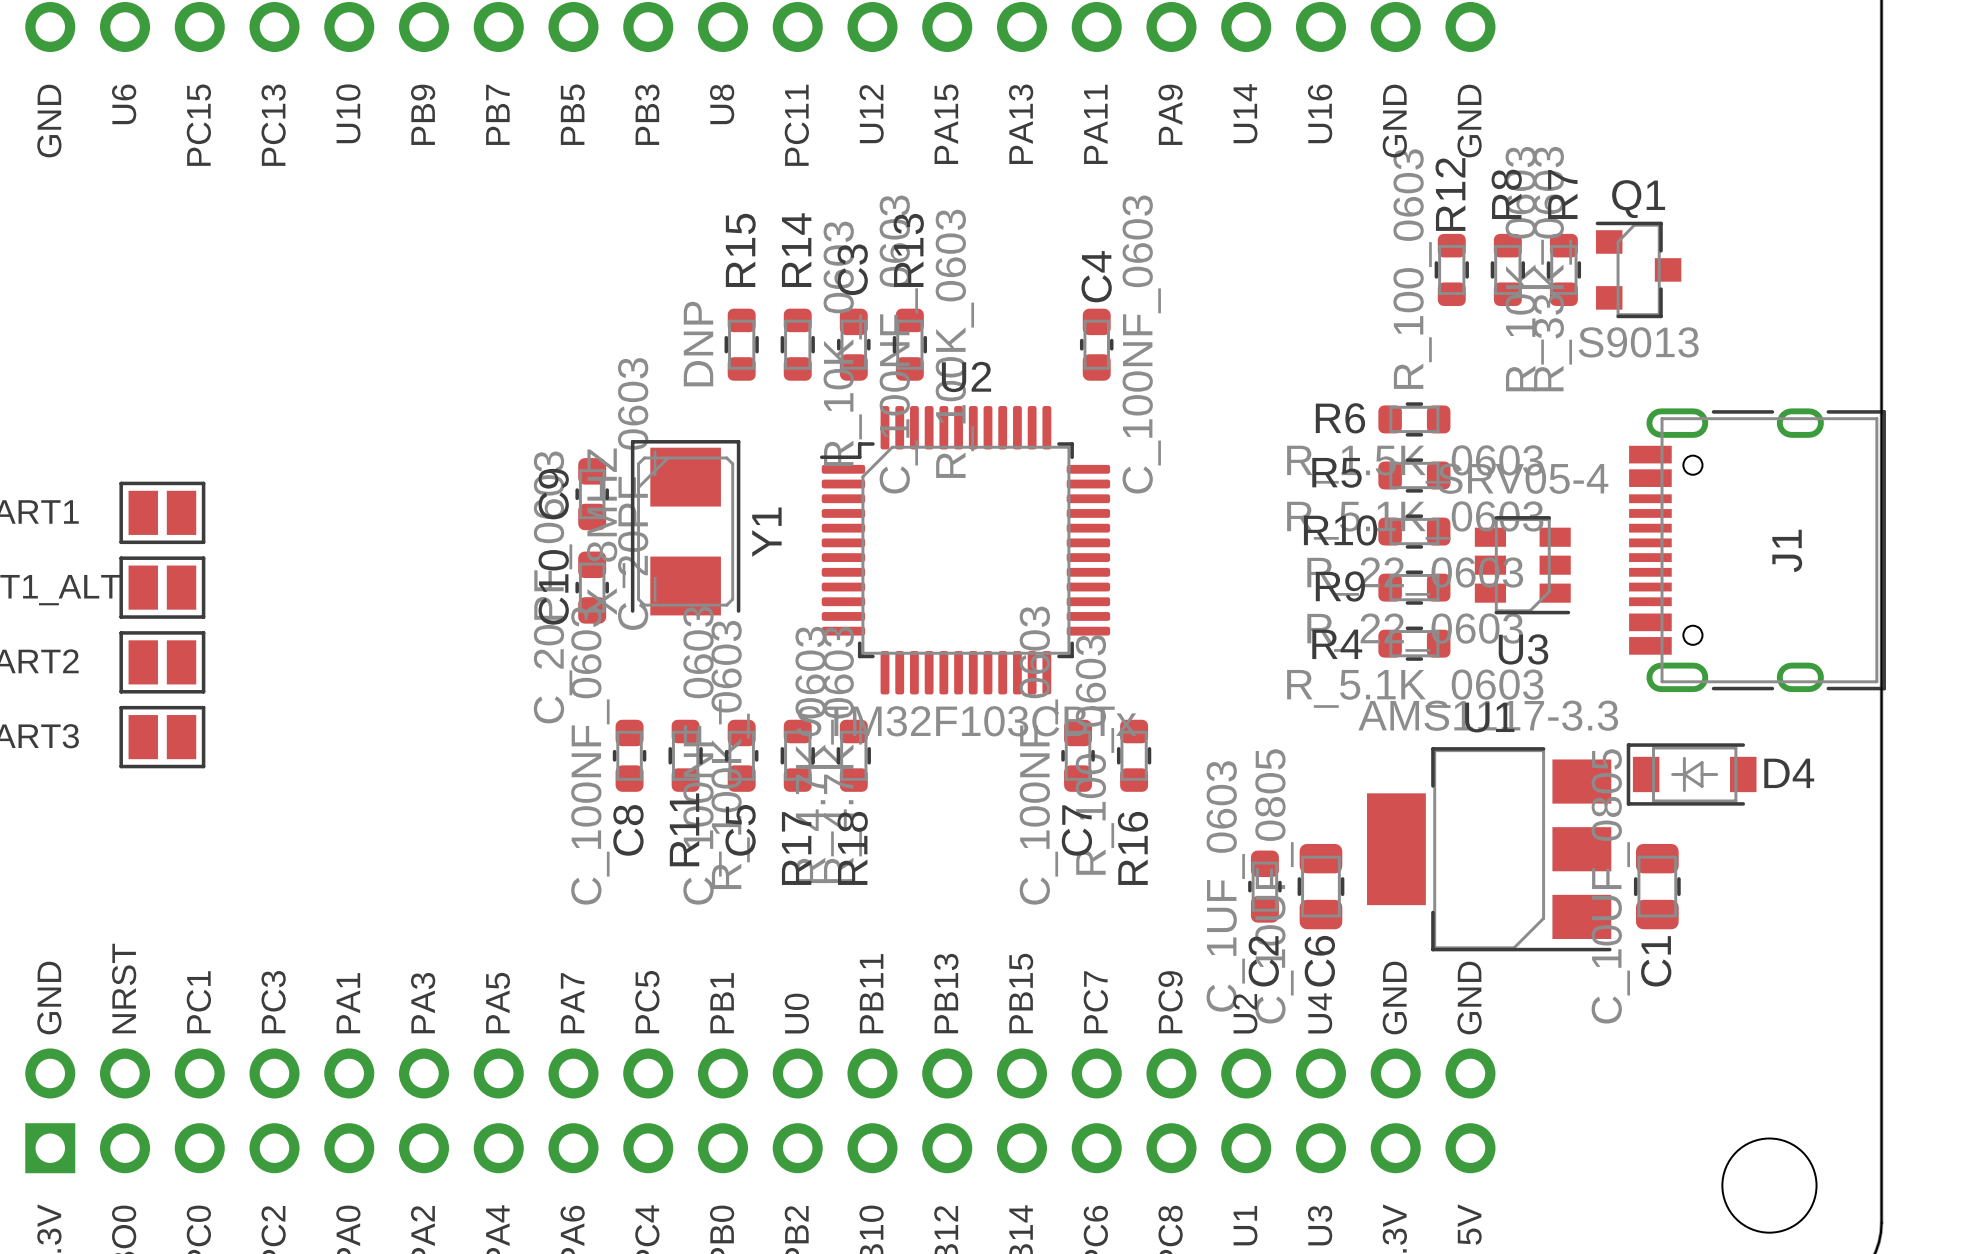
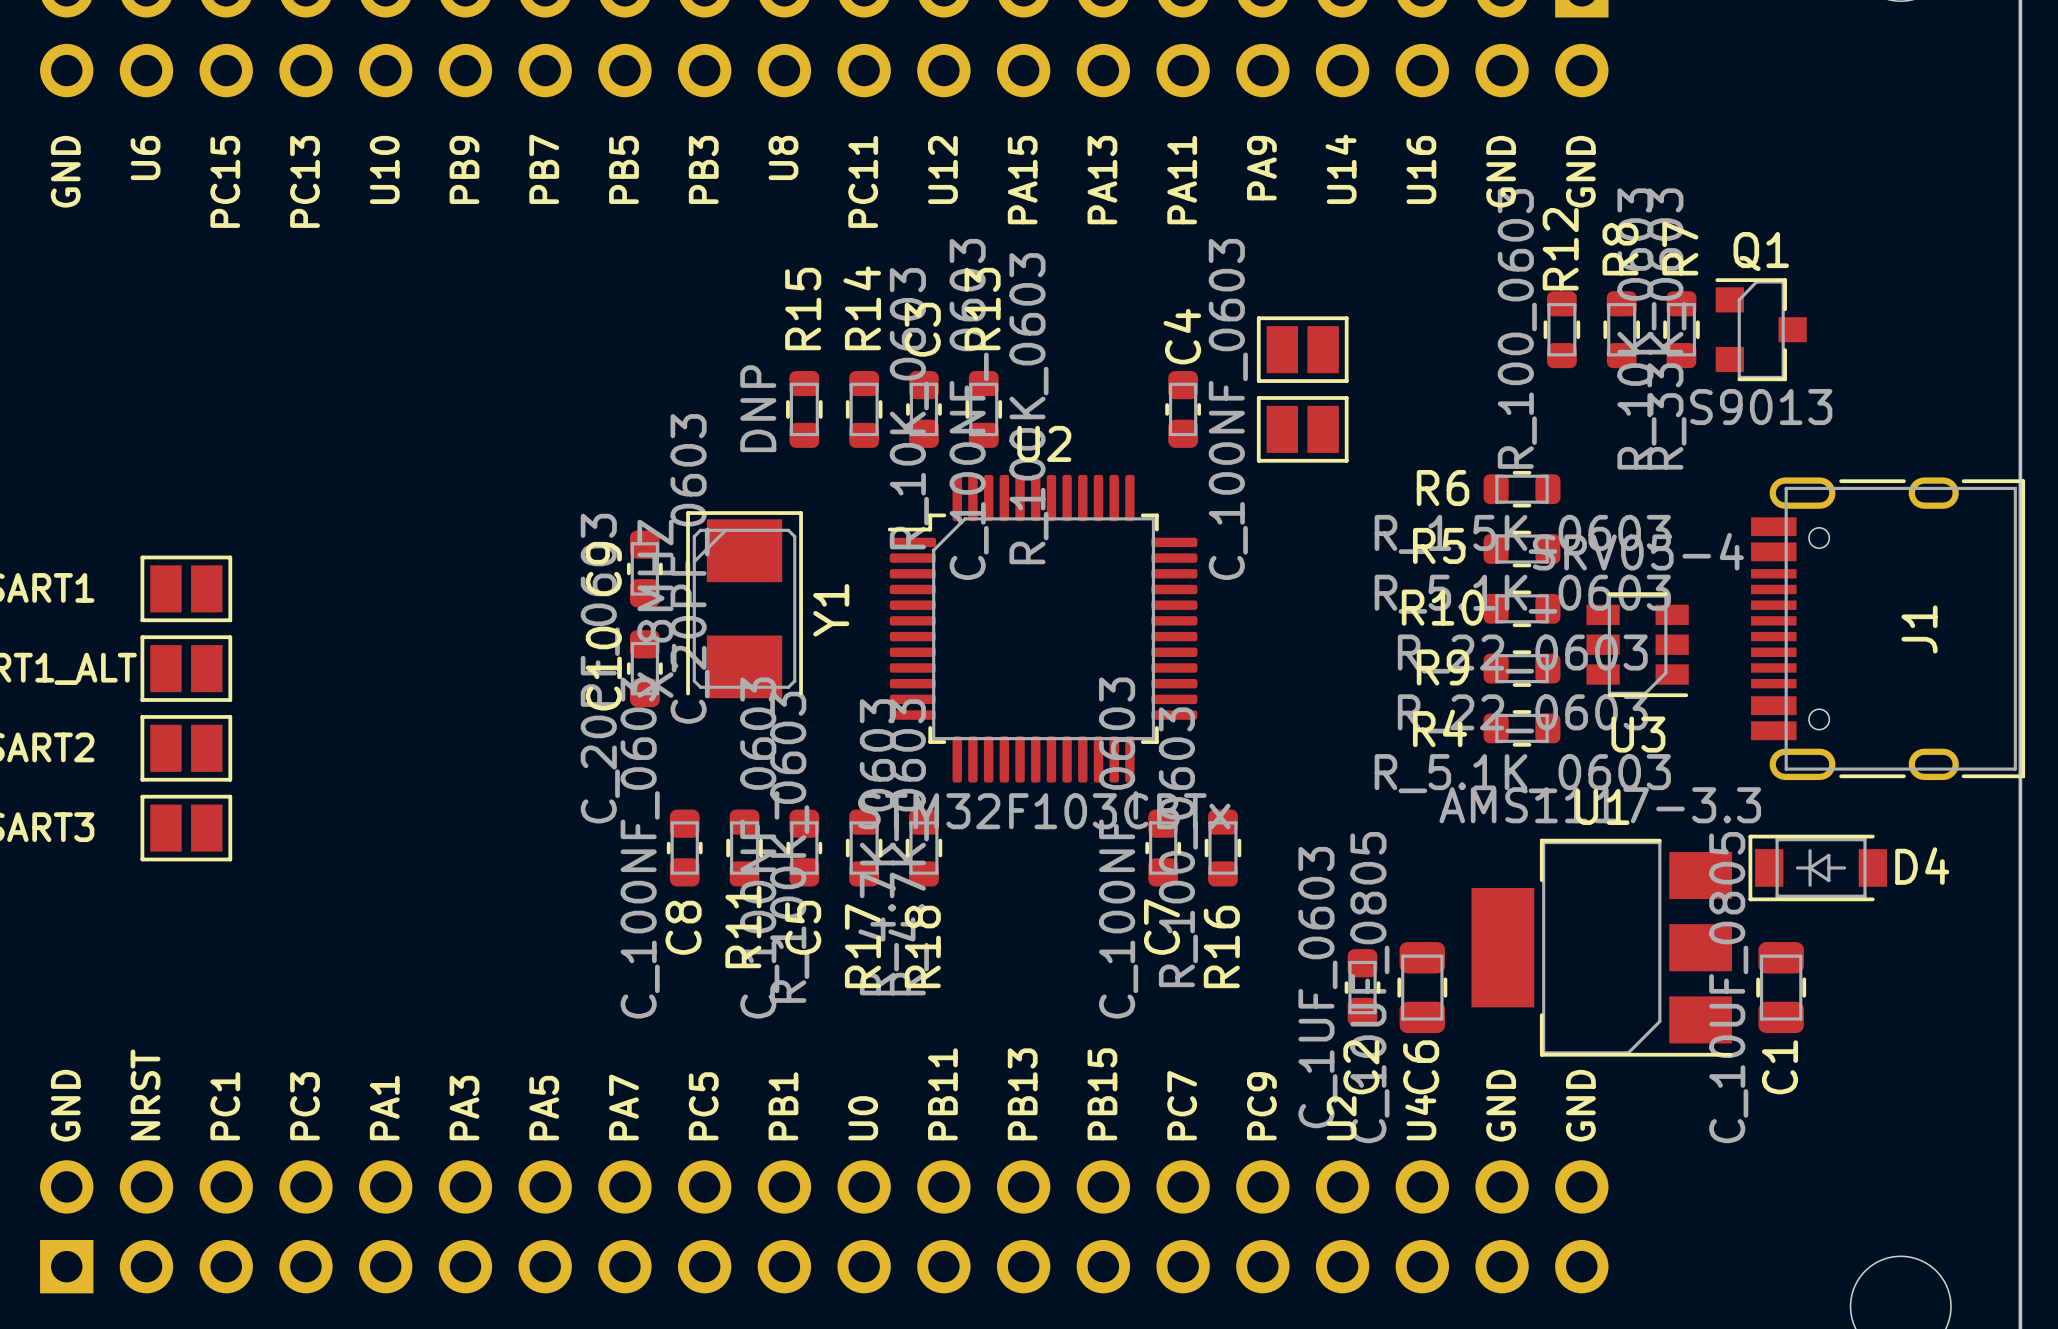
part: none -> (1302, 349)
part: none -> (1302, 429)

